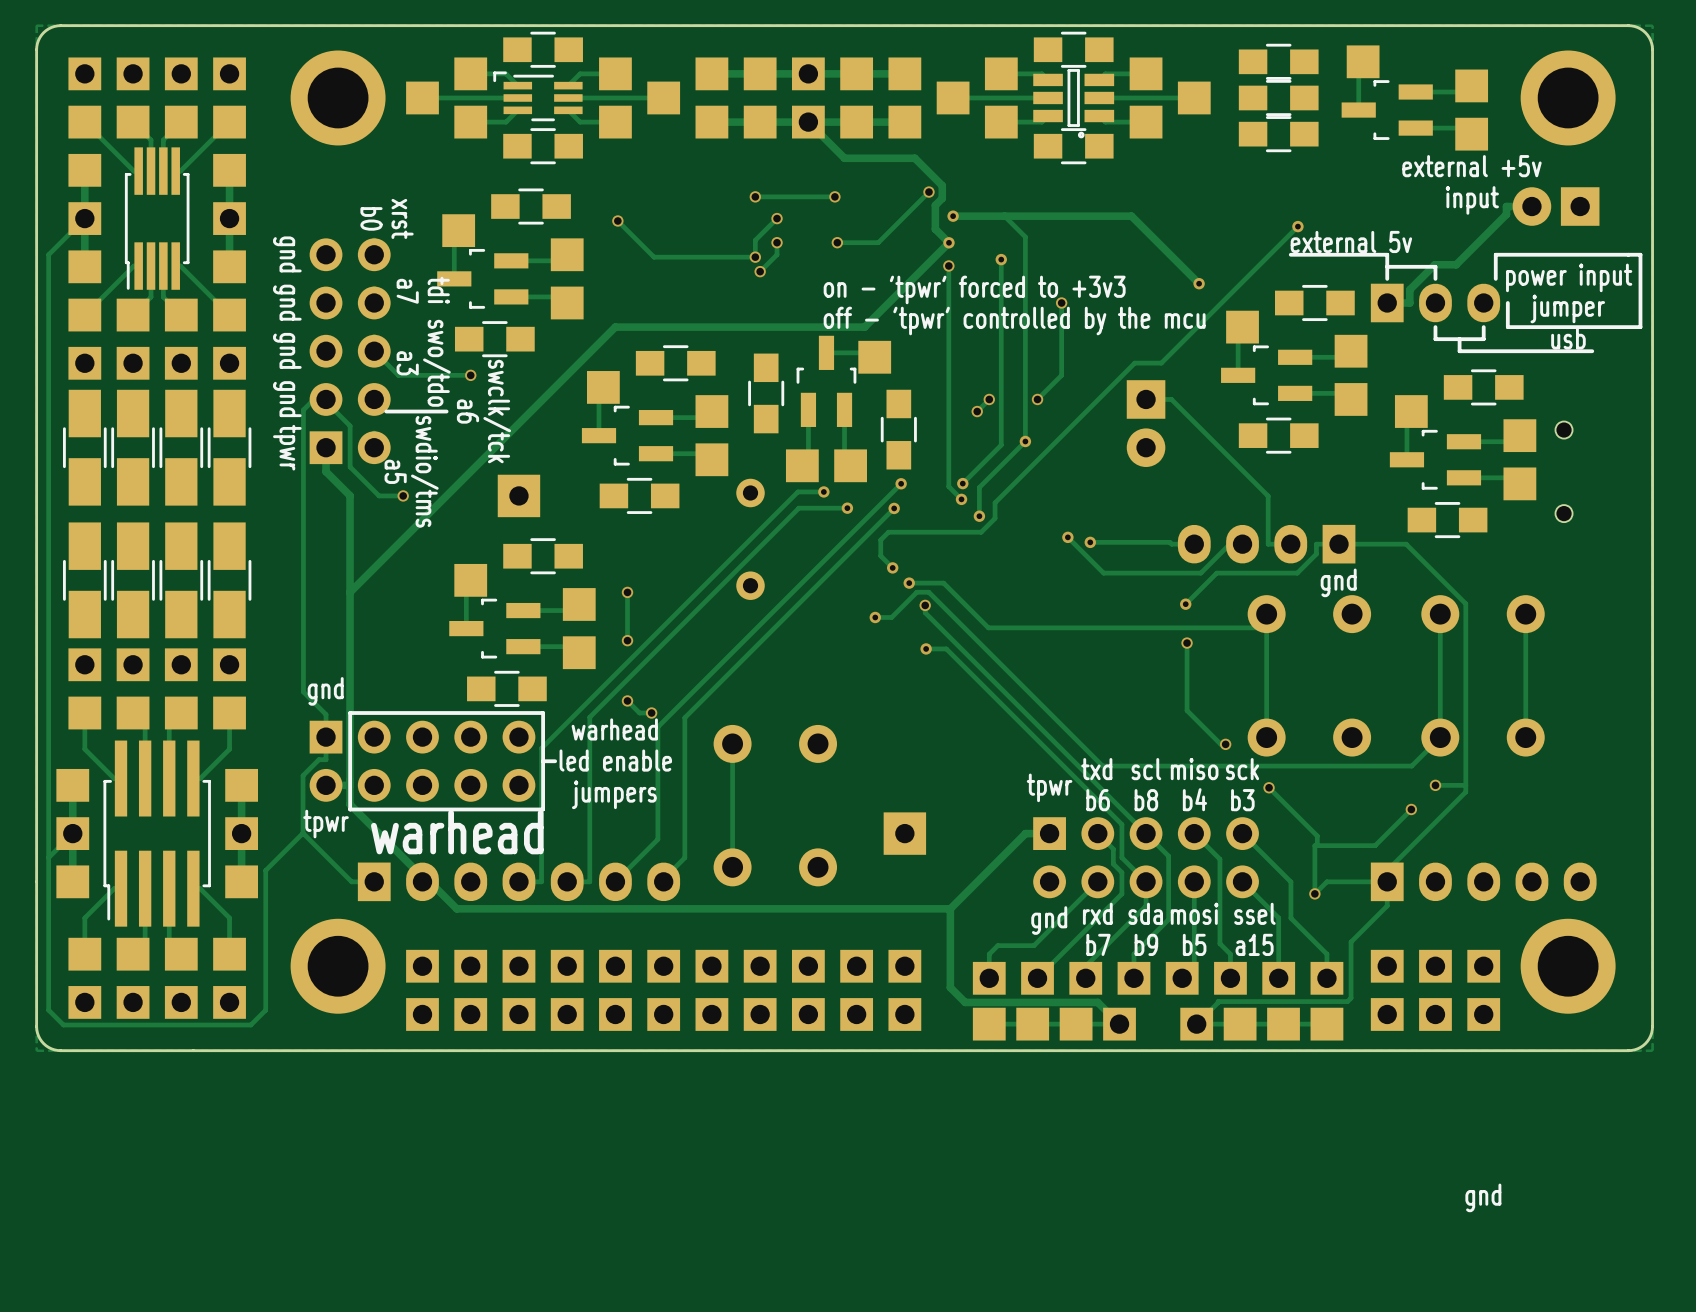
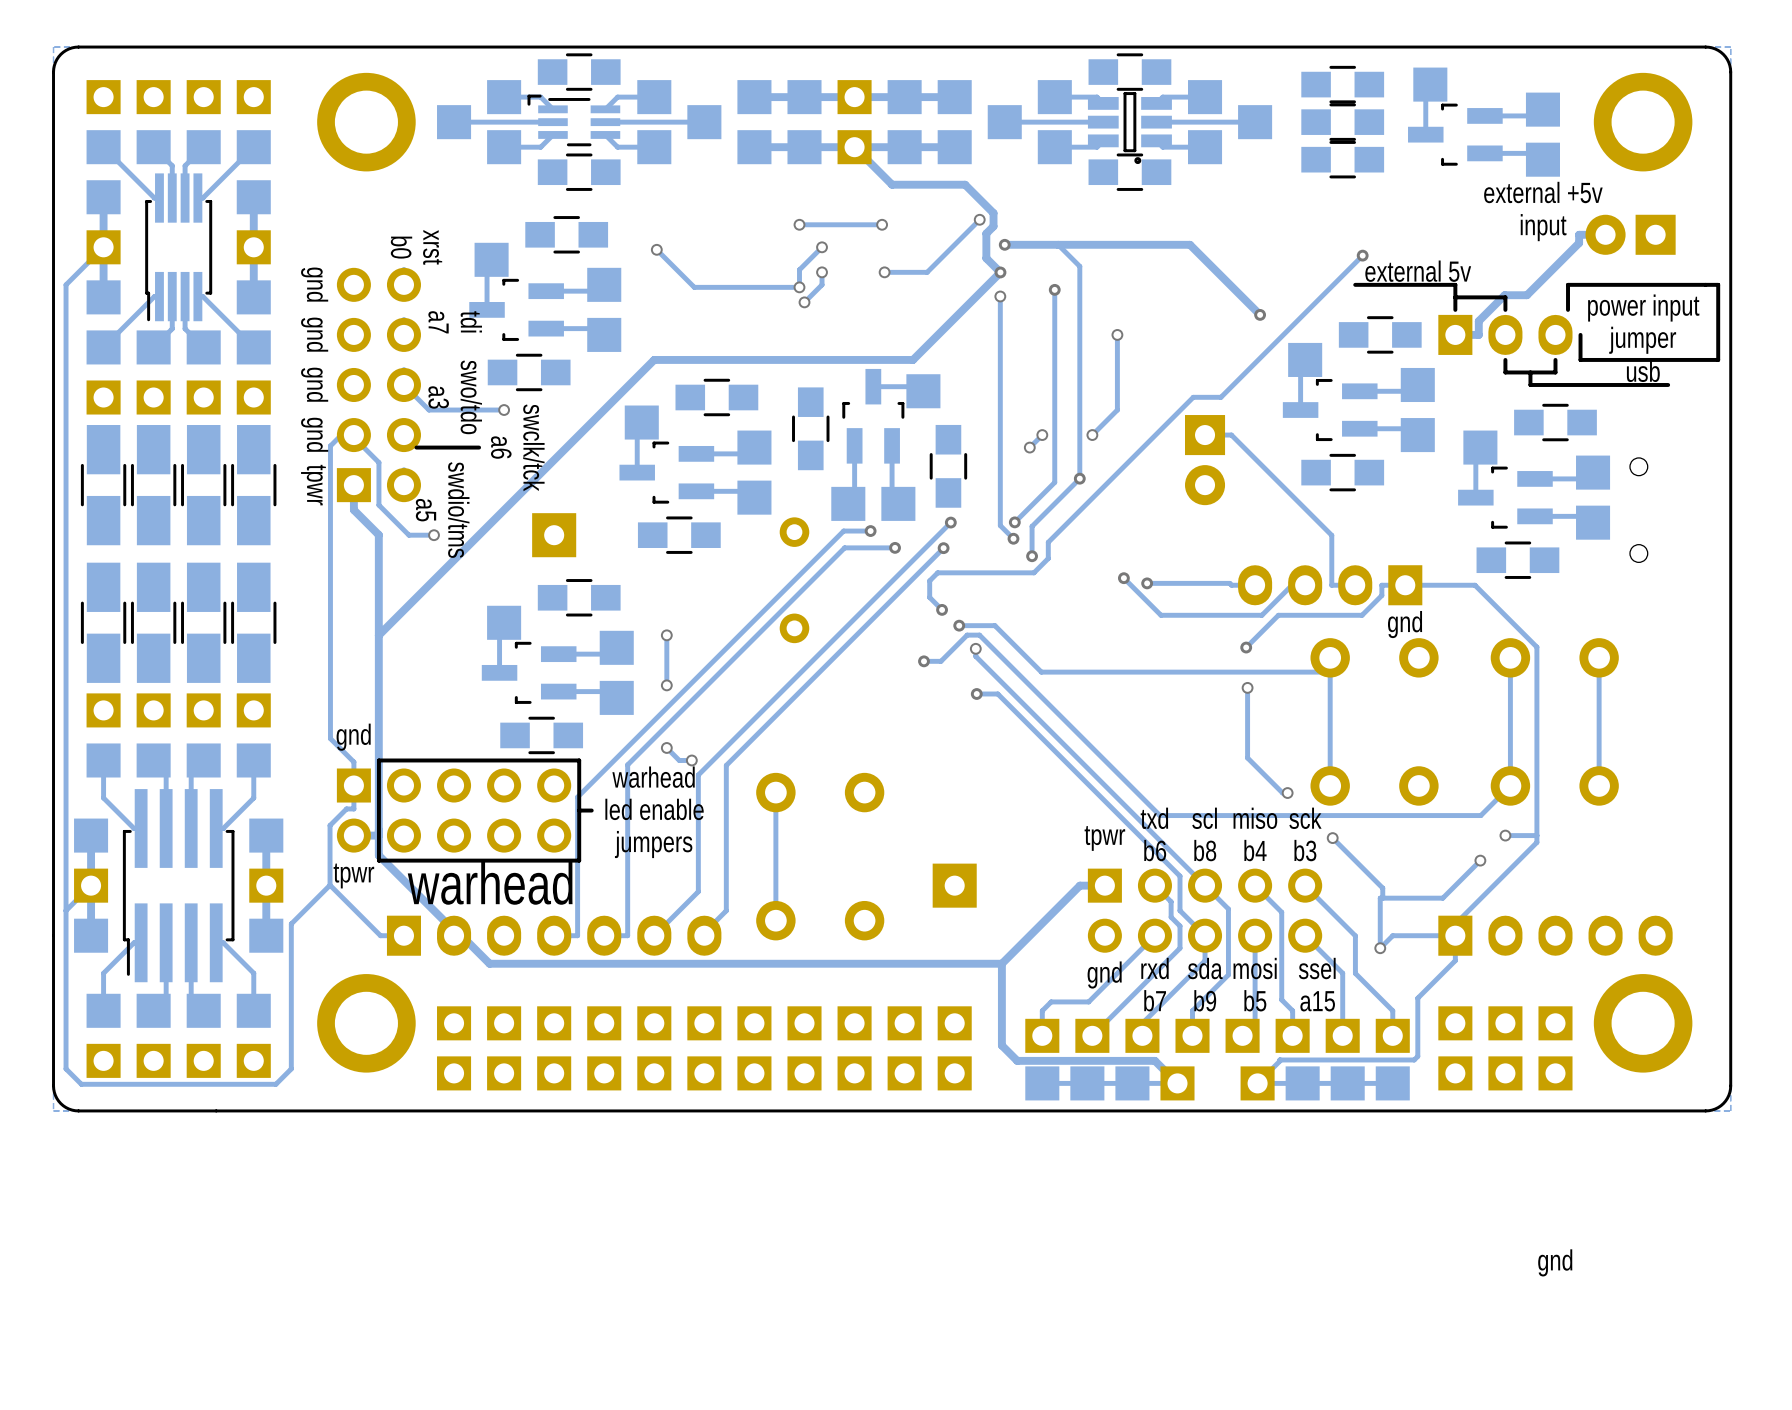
text: on - 'tpwr' forced to +3v3 (974, 289) -> none
text: off - 'tpwr' controlled by the mcu (1014, 321) -> none

